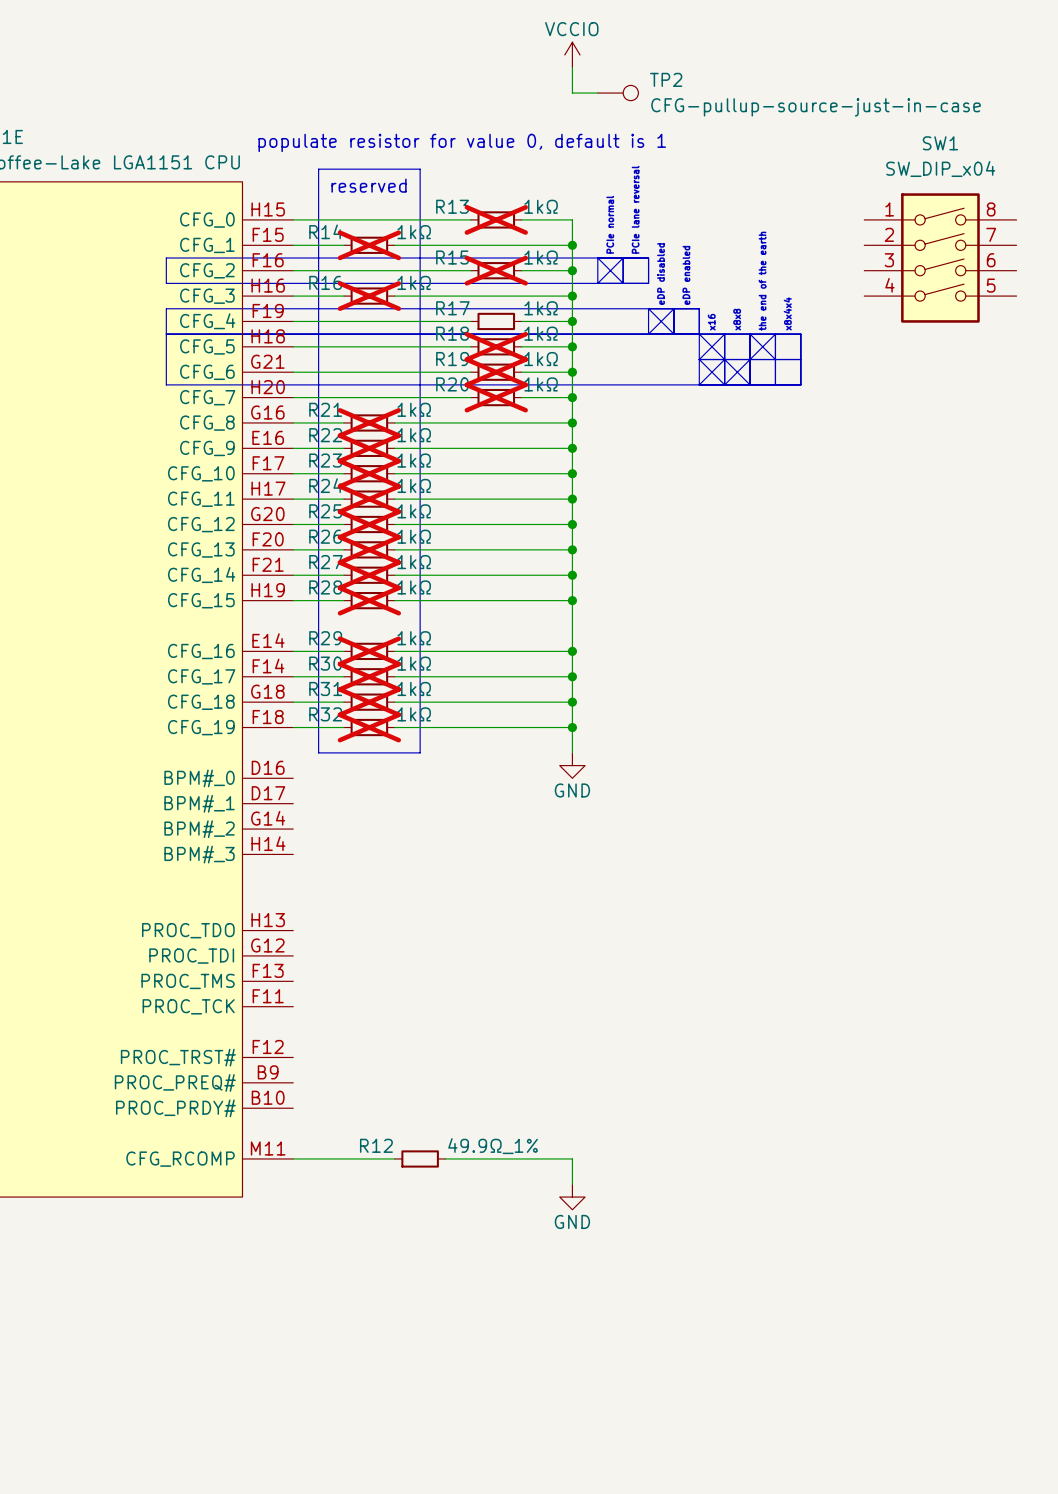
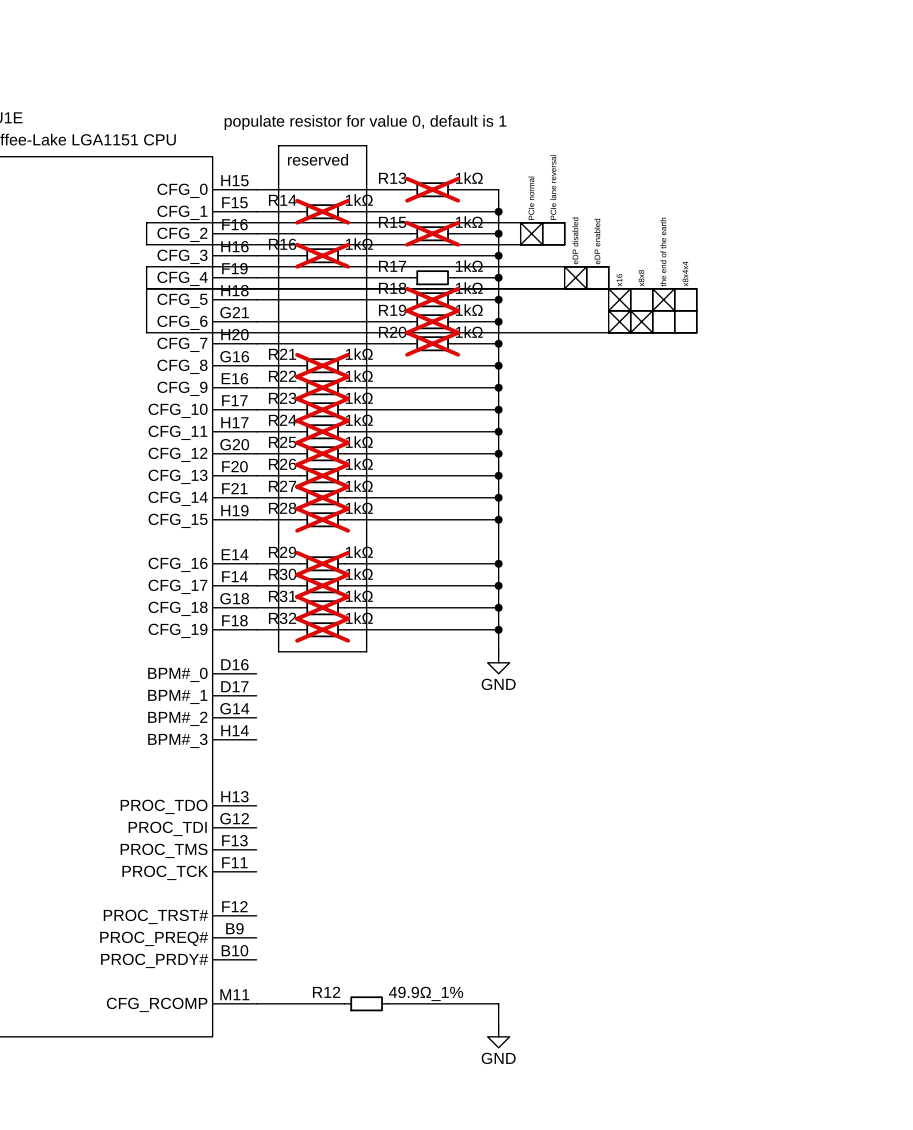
power symbol: VCCIO (572, 54) -> none
wire: (572, 67) (572, 93) (597, 93) -> none
TP2: CFG-pullup-source-just-in-case (618, 93) -> none
SW1: SW_DIP_x04 (940, 258) -> none

